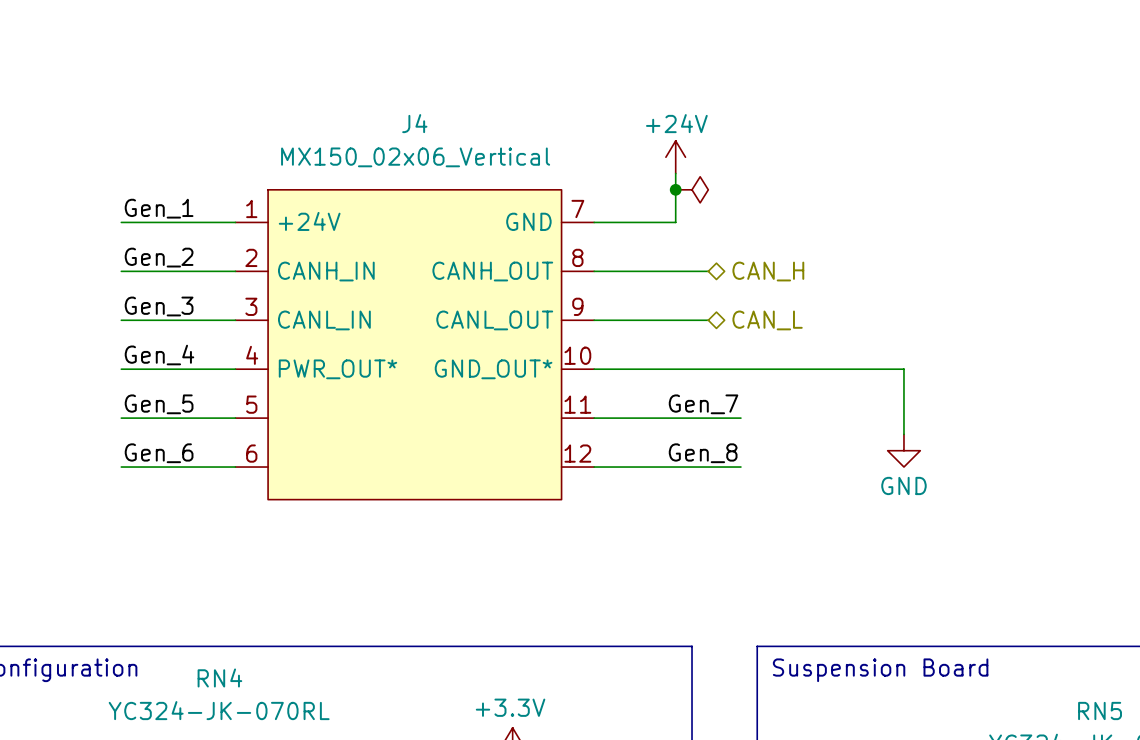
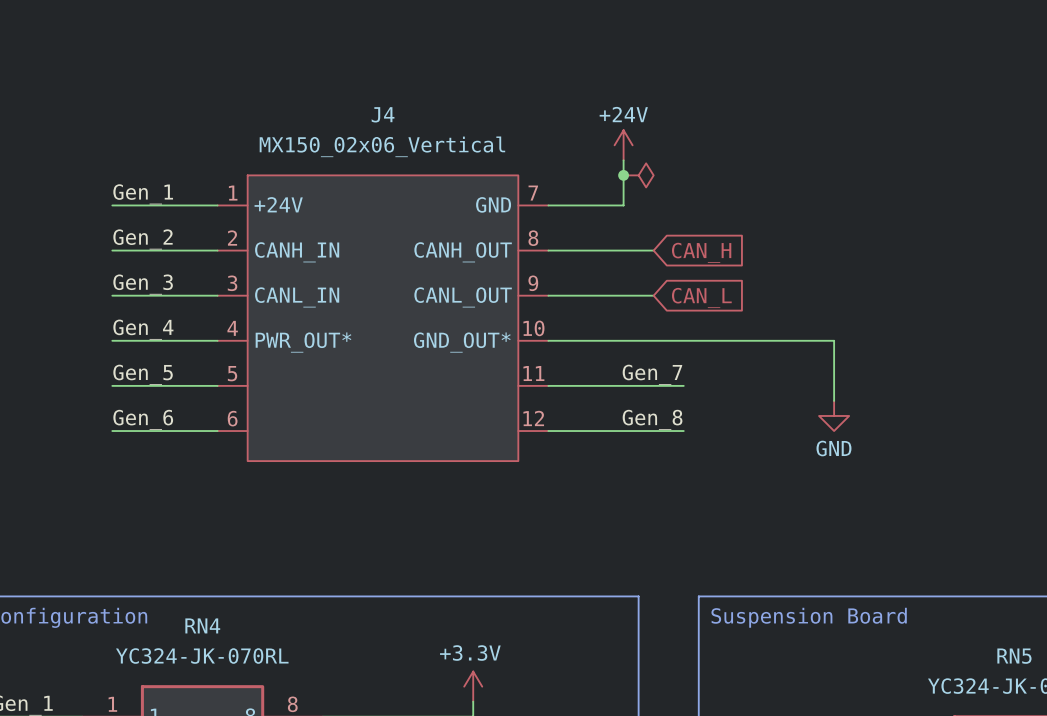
hierarchical label: CAN_H (768, 271) -> none
global label: none -> CAN_H (701, 252)
hierarchical label: CAN_L (767, 320) -> none
global label: none -> CAN_L (701, 297)

